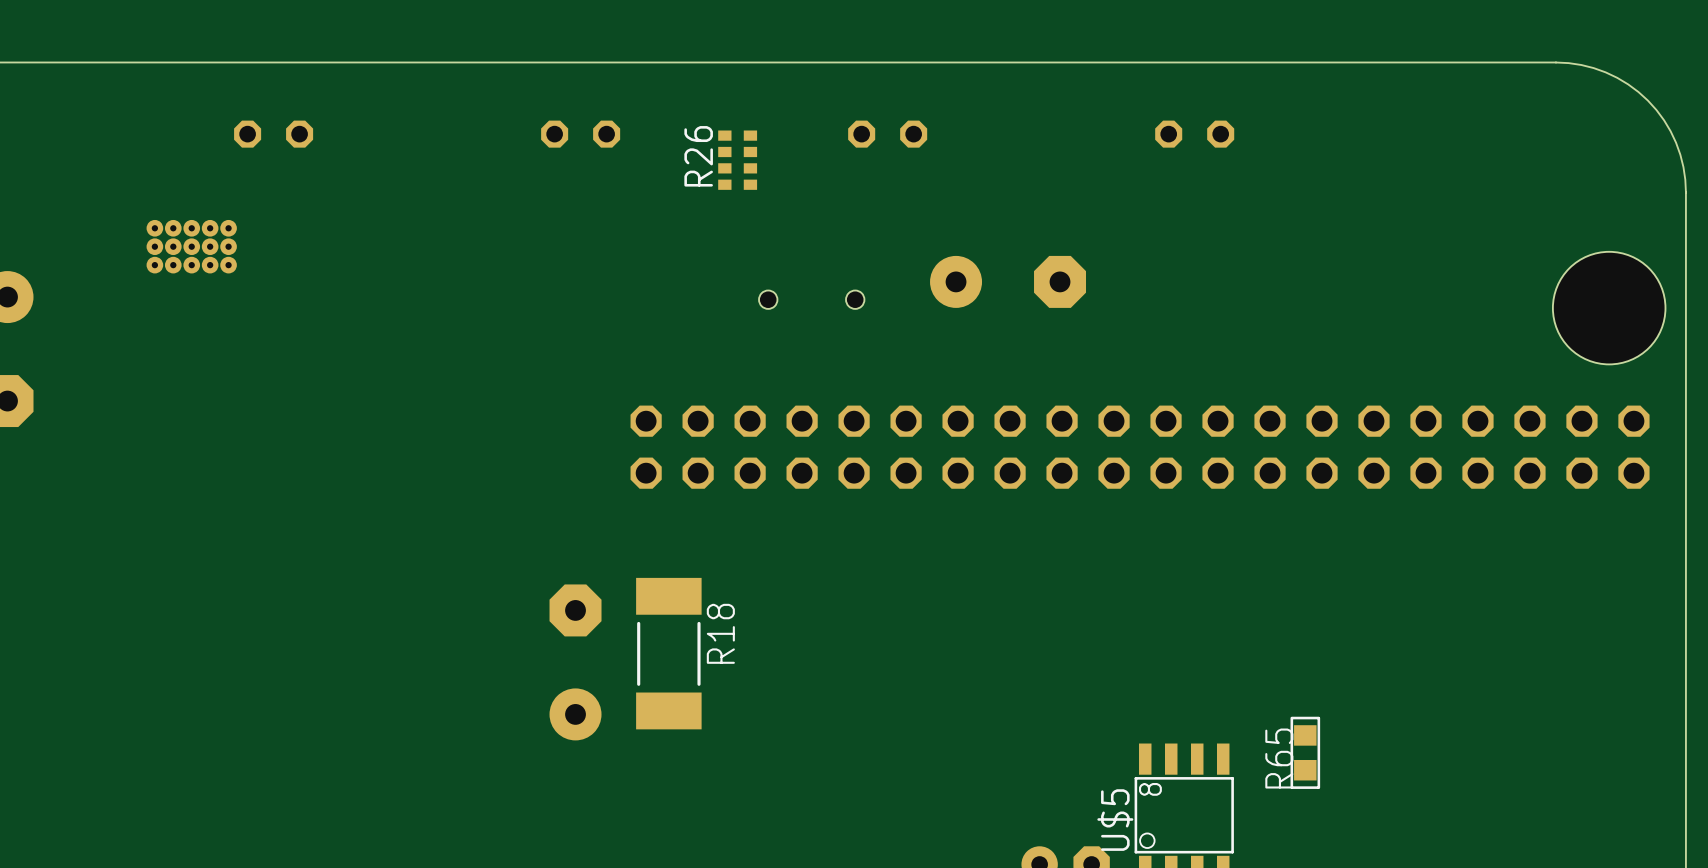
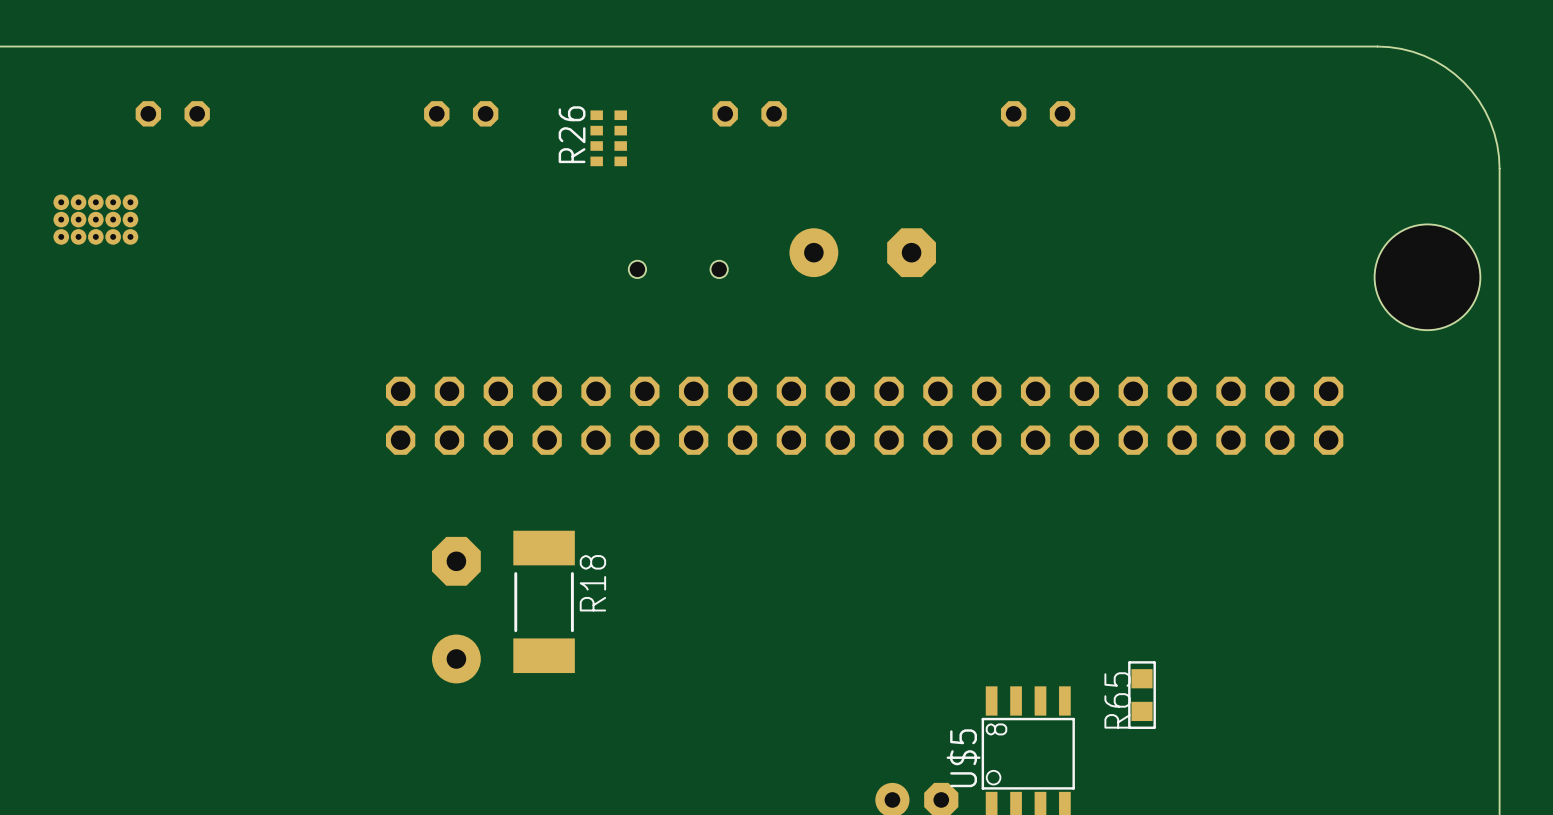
part position: (1140, 447) -> (864, 415)

